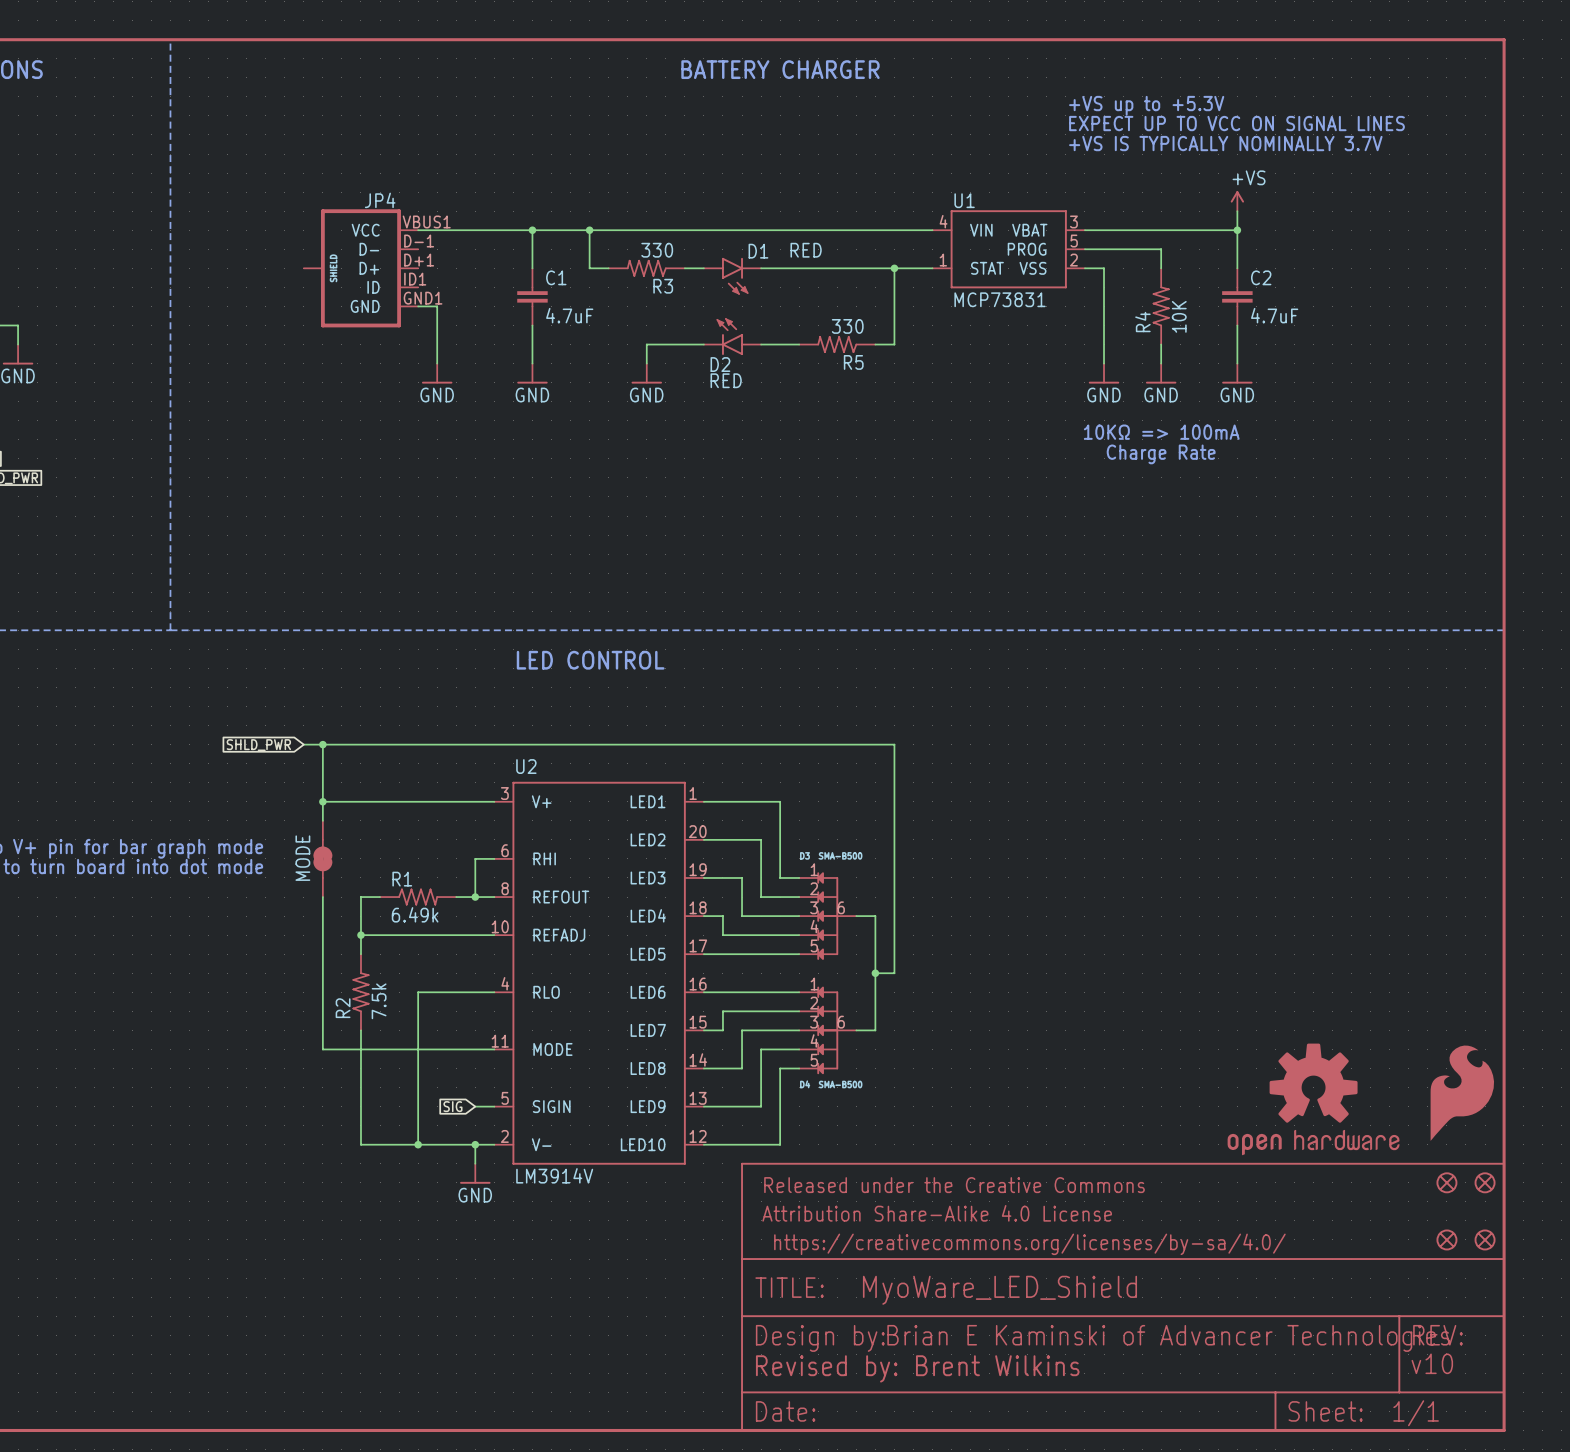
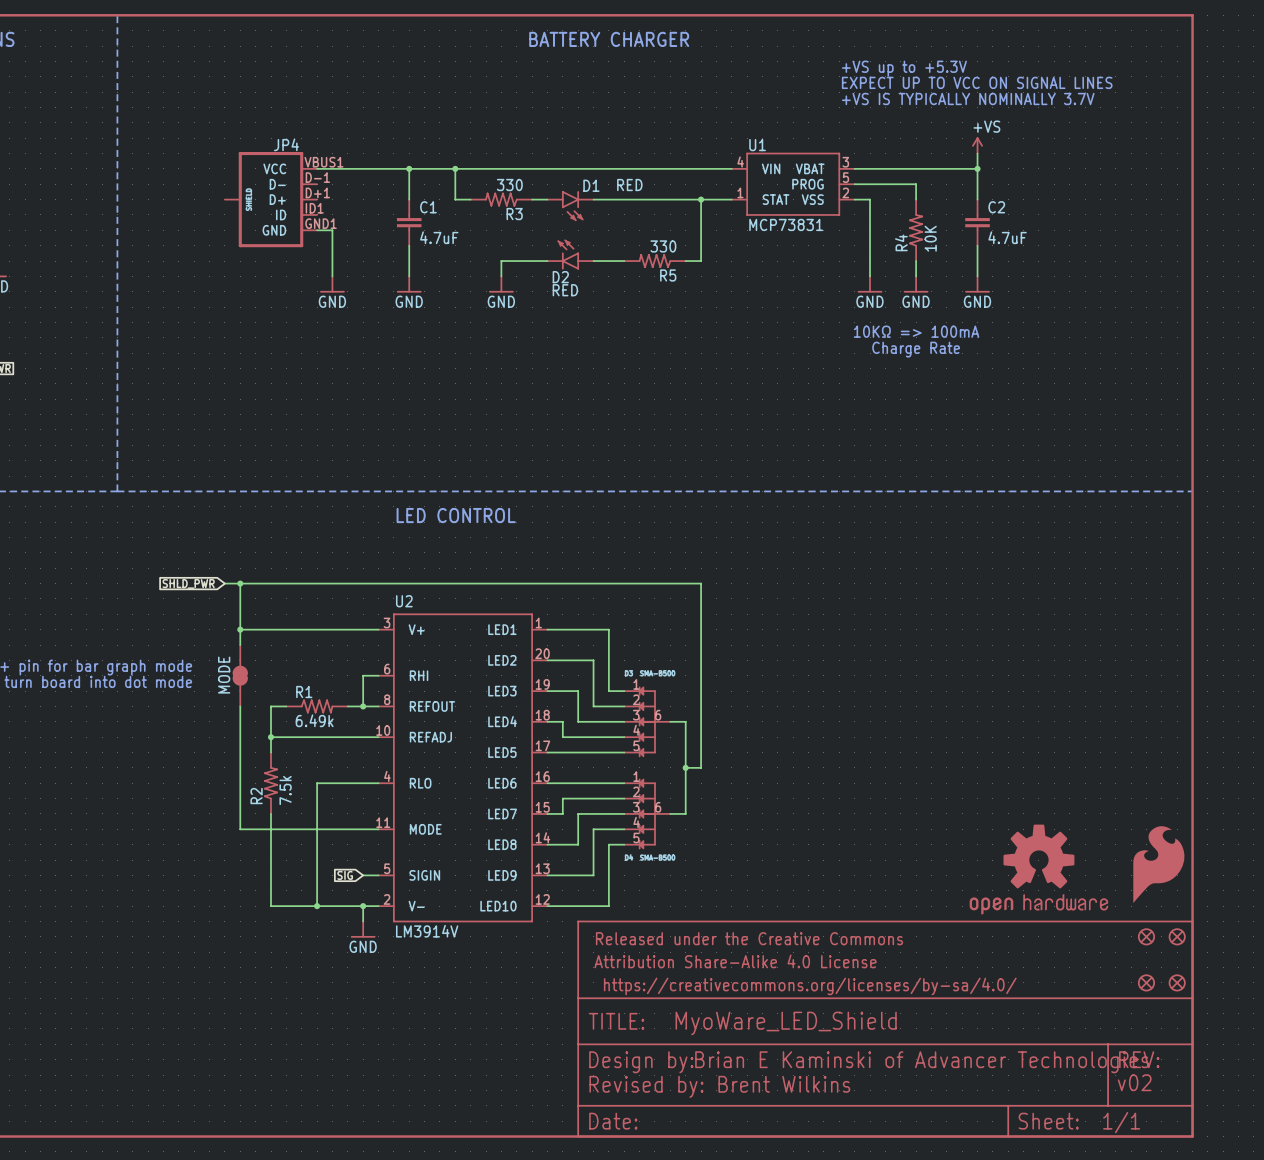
text: v10 (1432, 1363) -> v02 (1134, 1082)

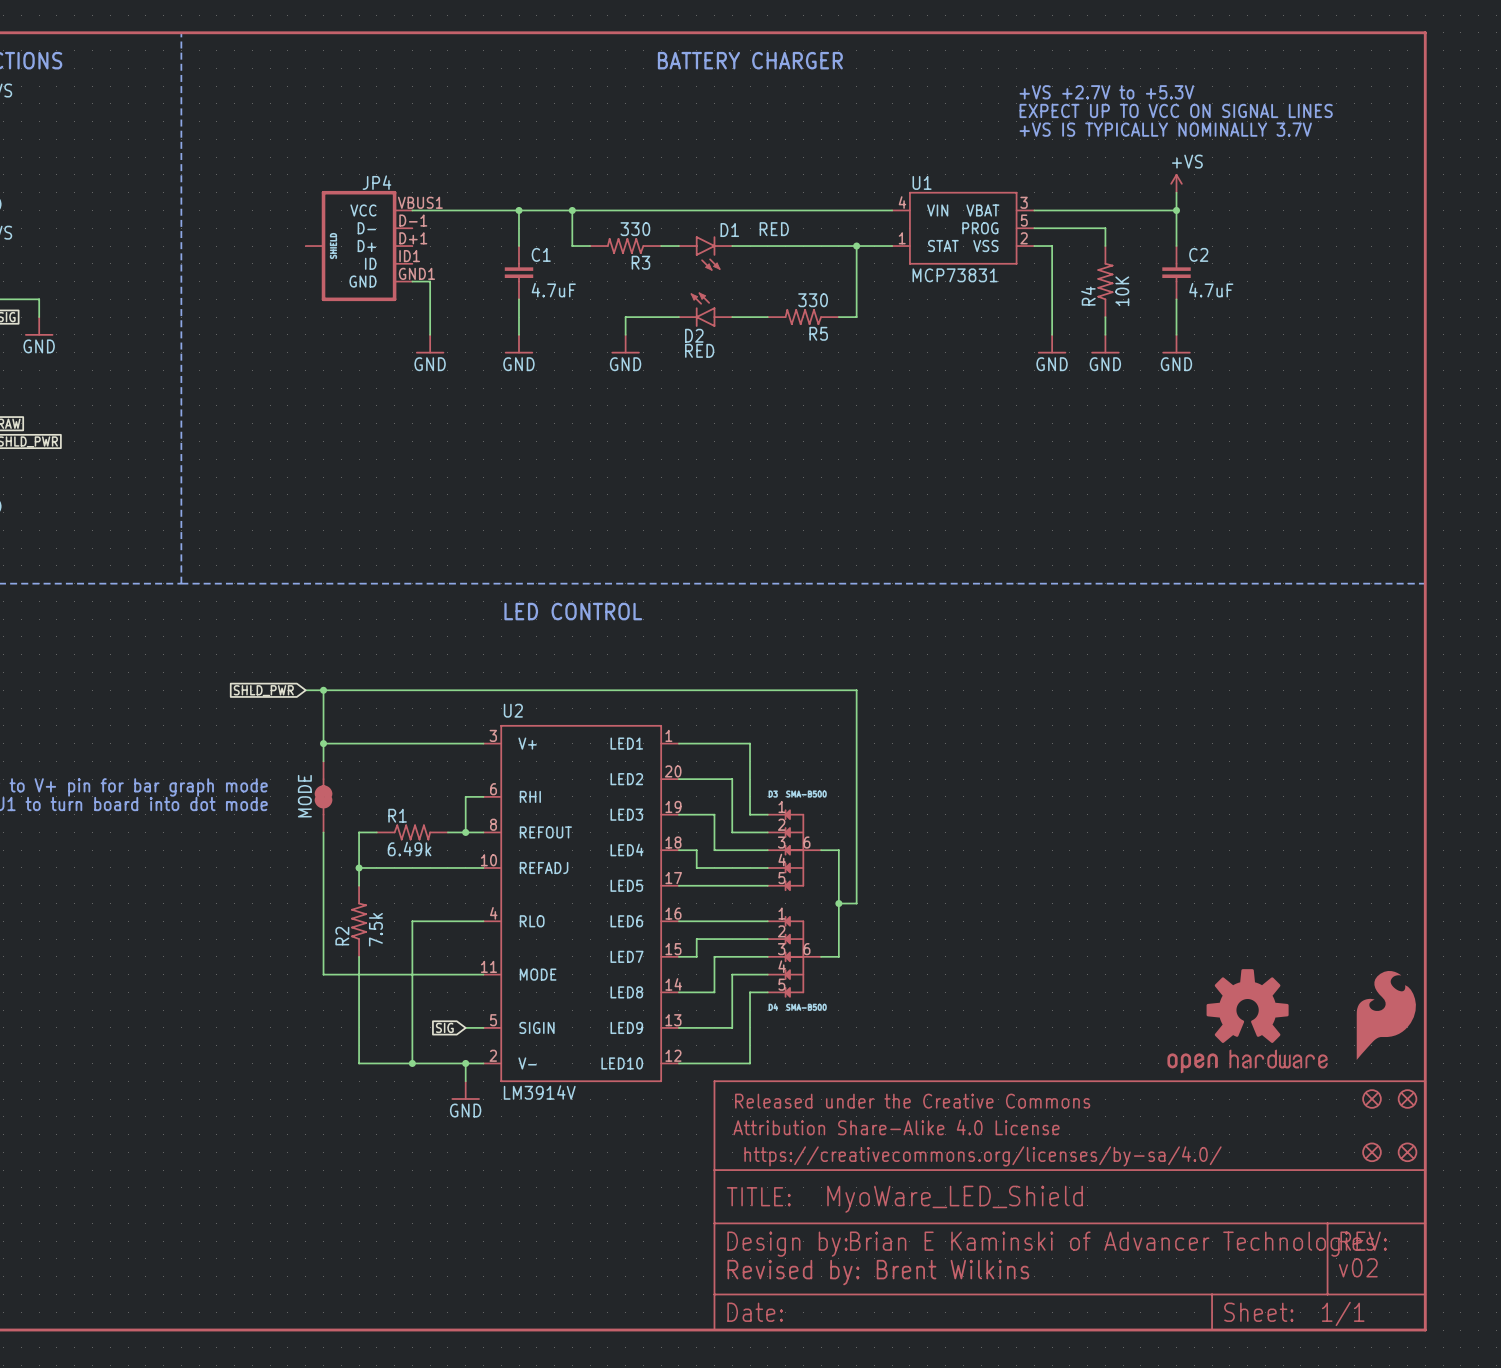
text: +VS up to +5.3V (904, 68) -> +VS +2.7V to +5.3V (1106, 92)
text: 10KΩ => 100mA (916, 331) -> none
text: Charge Rate (916, 349) -> none

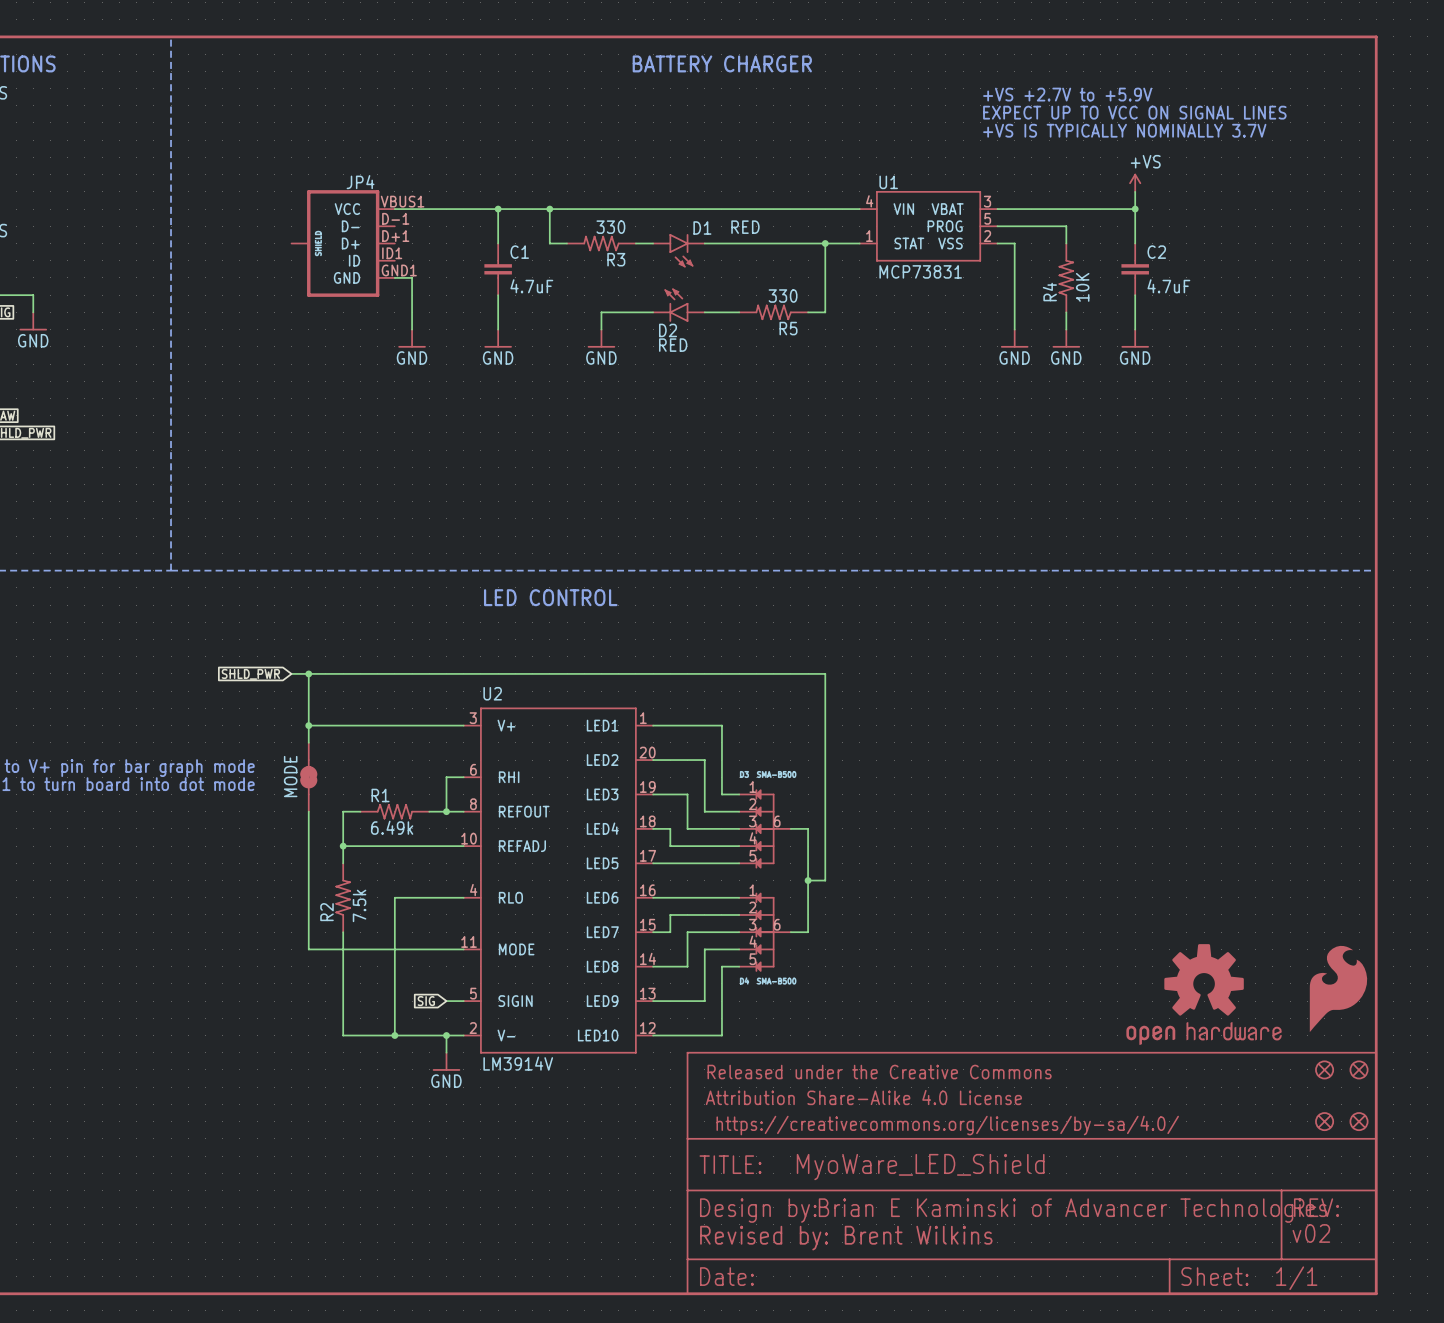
text: +VS +2.7V to +5.3V (1106, 92) -> +VS +2.7V to +5.9V (1067, 94)

